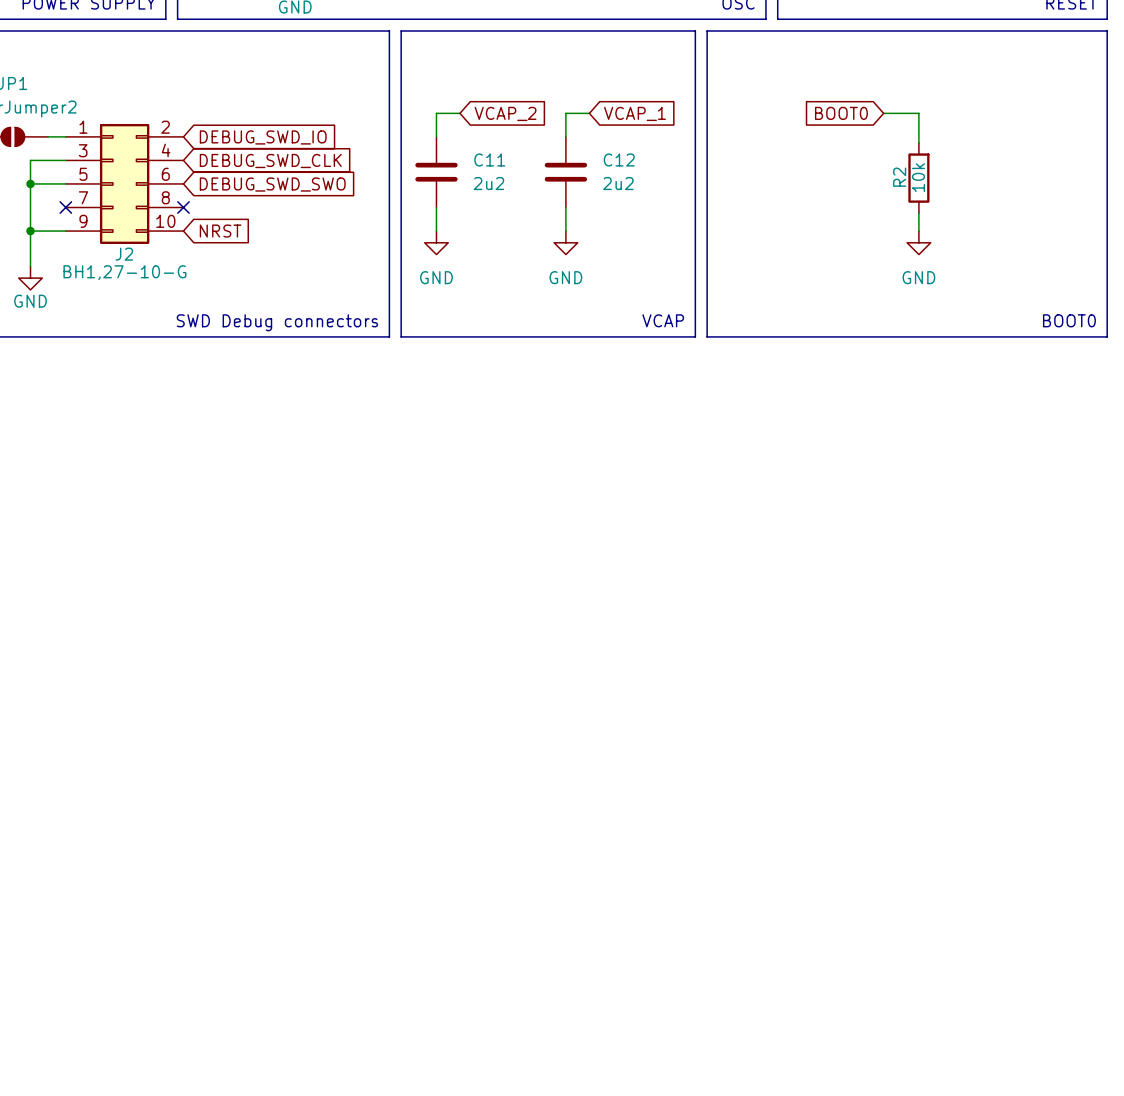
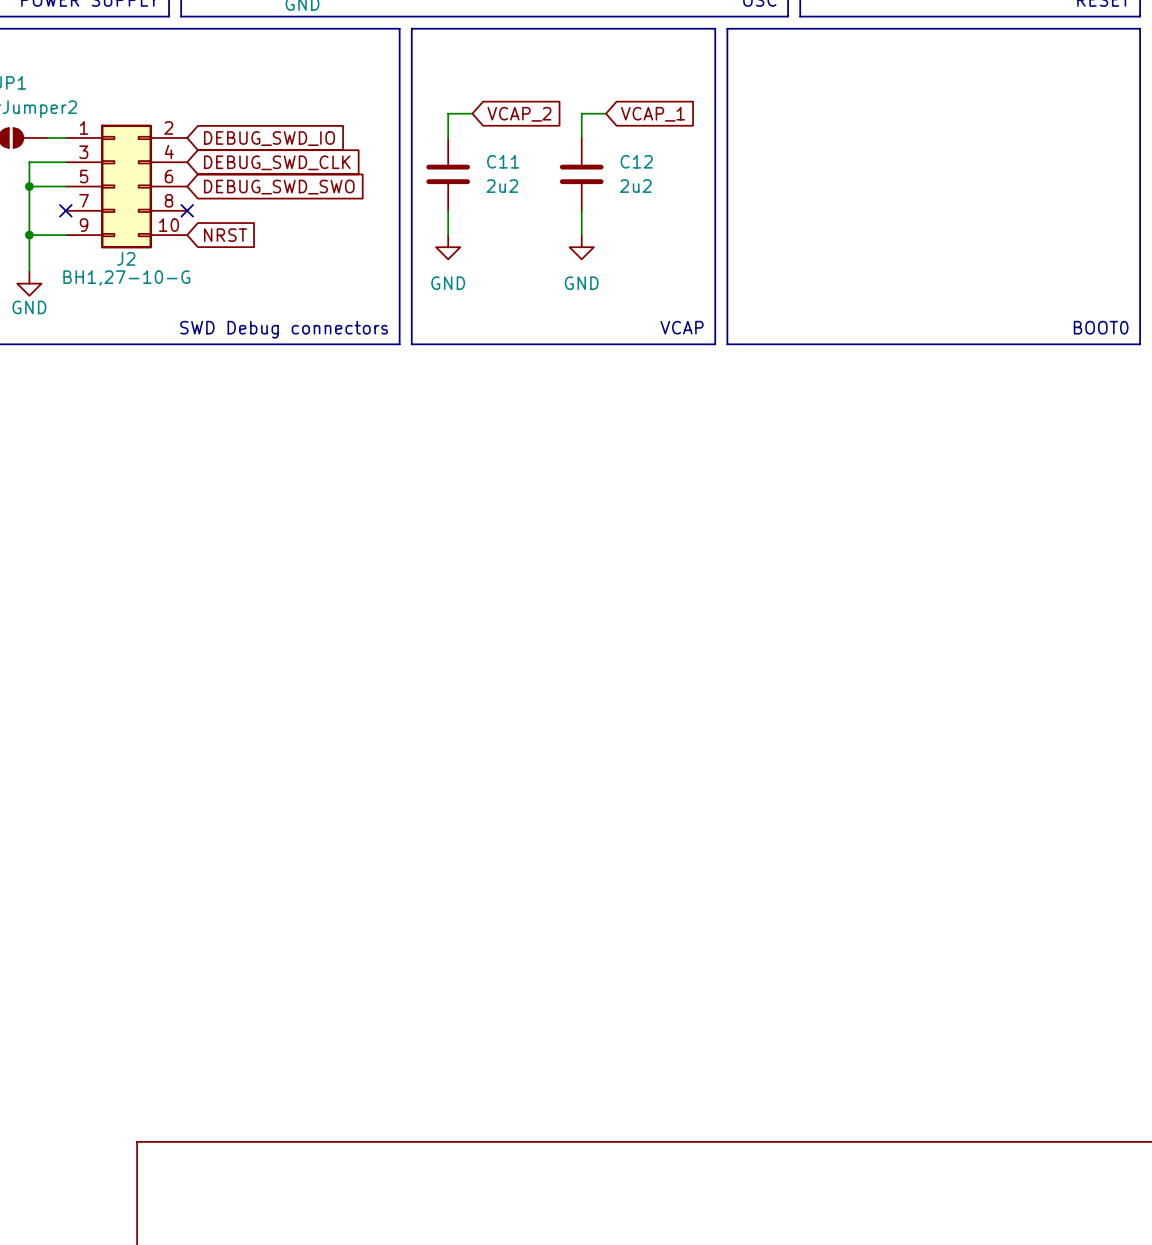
global label: BOOT0 (841, 113) -> none
wire: (883, 113) (918, 113) (918, 142) -> none
R2: 10k (918, 178) -> none
wire: (918, 213) (918, 231) -> none
power symbol: GND (918, 242) -> none

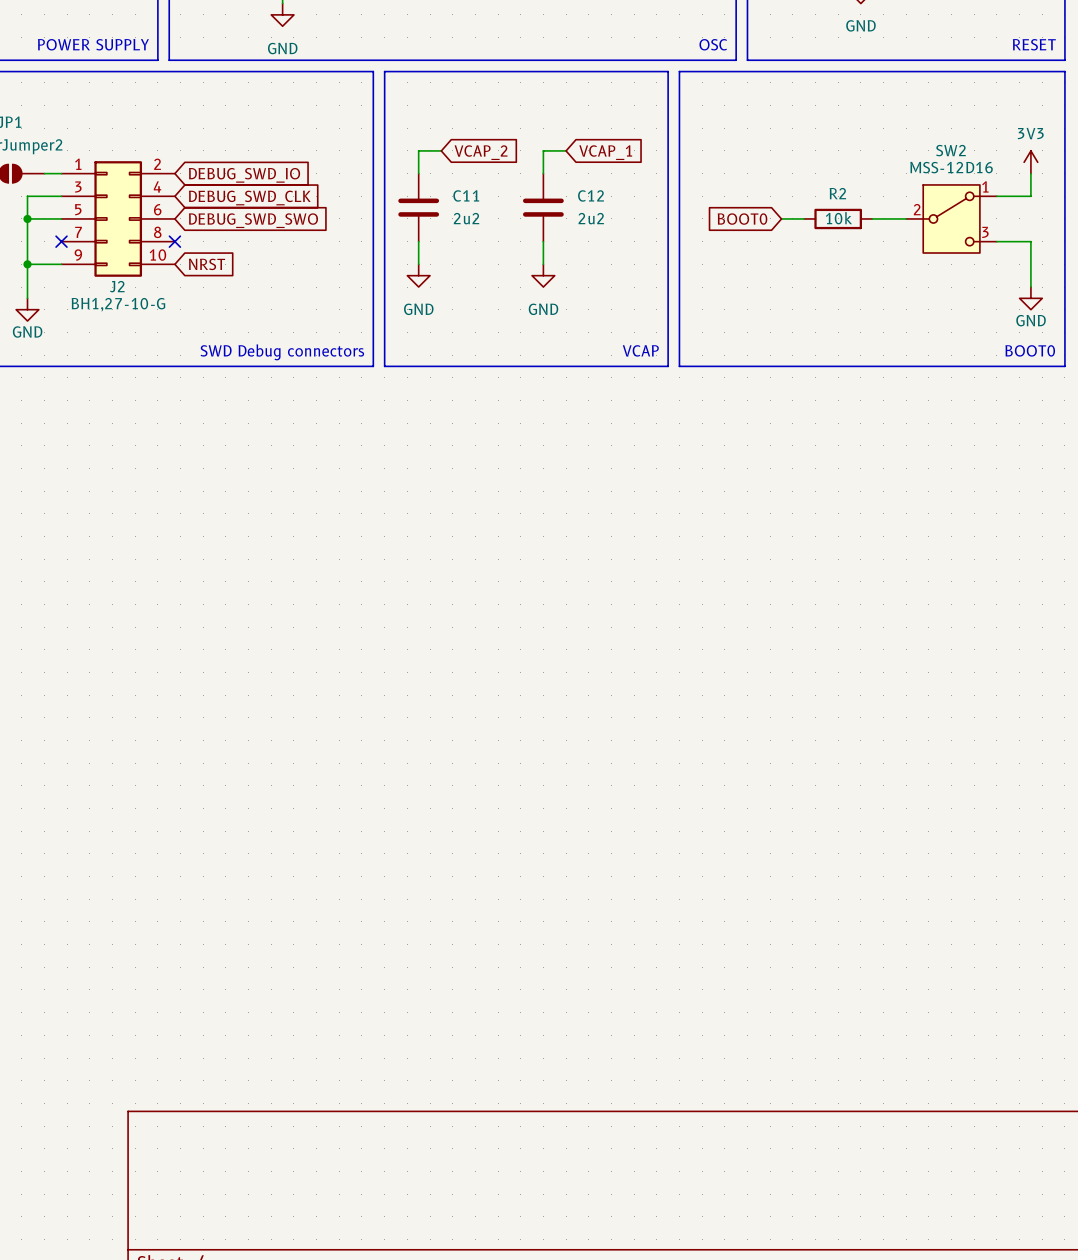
power symbol: none -> 3V3 (1030, 162)
wire: none -> (1030, 173) (1030, 196) (996, 196)
global label: none -> BOOT0 (742, 219)
wire: none -> (781, 218) (804, 218)
R2: none -> 10k (838, 218)
wire: none -> (872, 218) (906, 218)
SW2: none -> MSS-12D16 (951, 218)
wire: none -> (996, 241) (1030, 241) (1030, 287)
power symbol: none -> GND (1030, 298)

